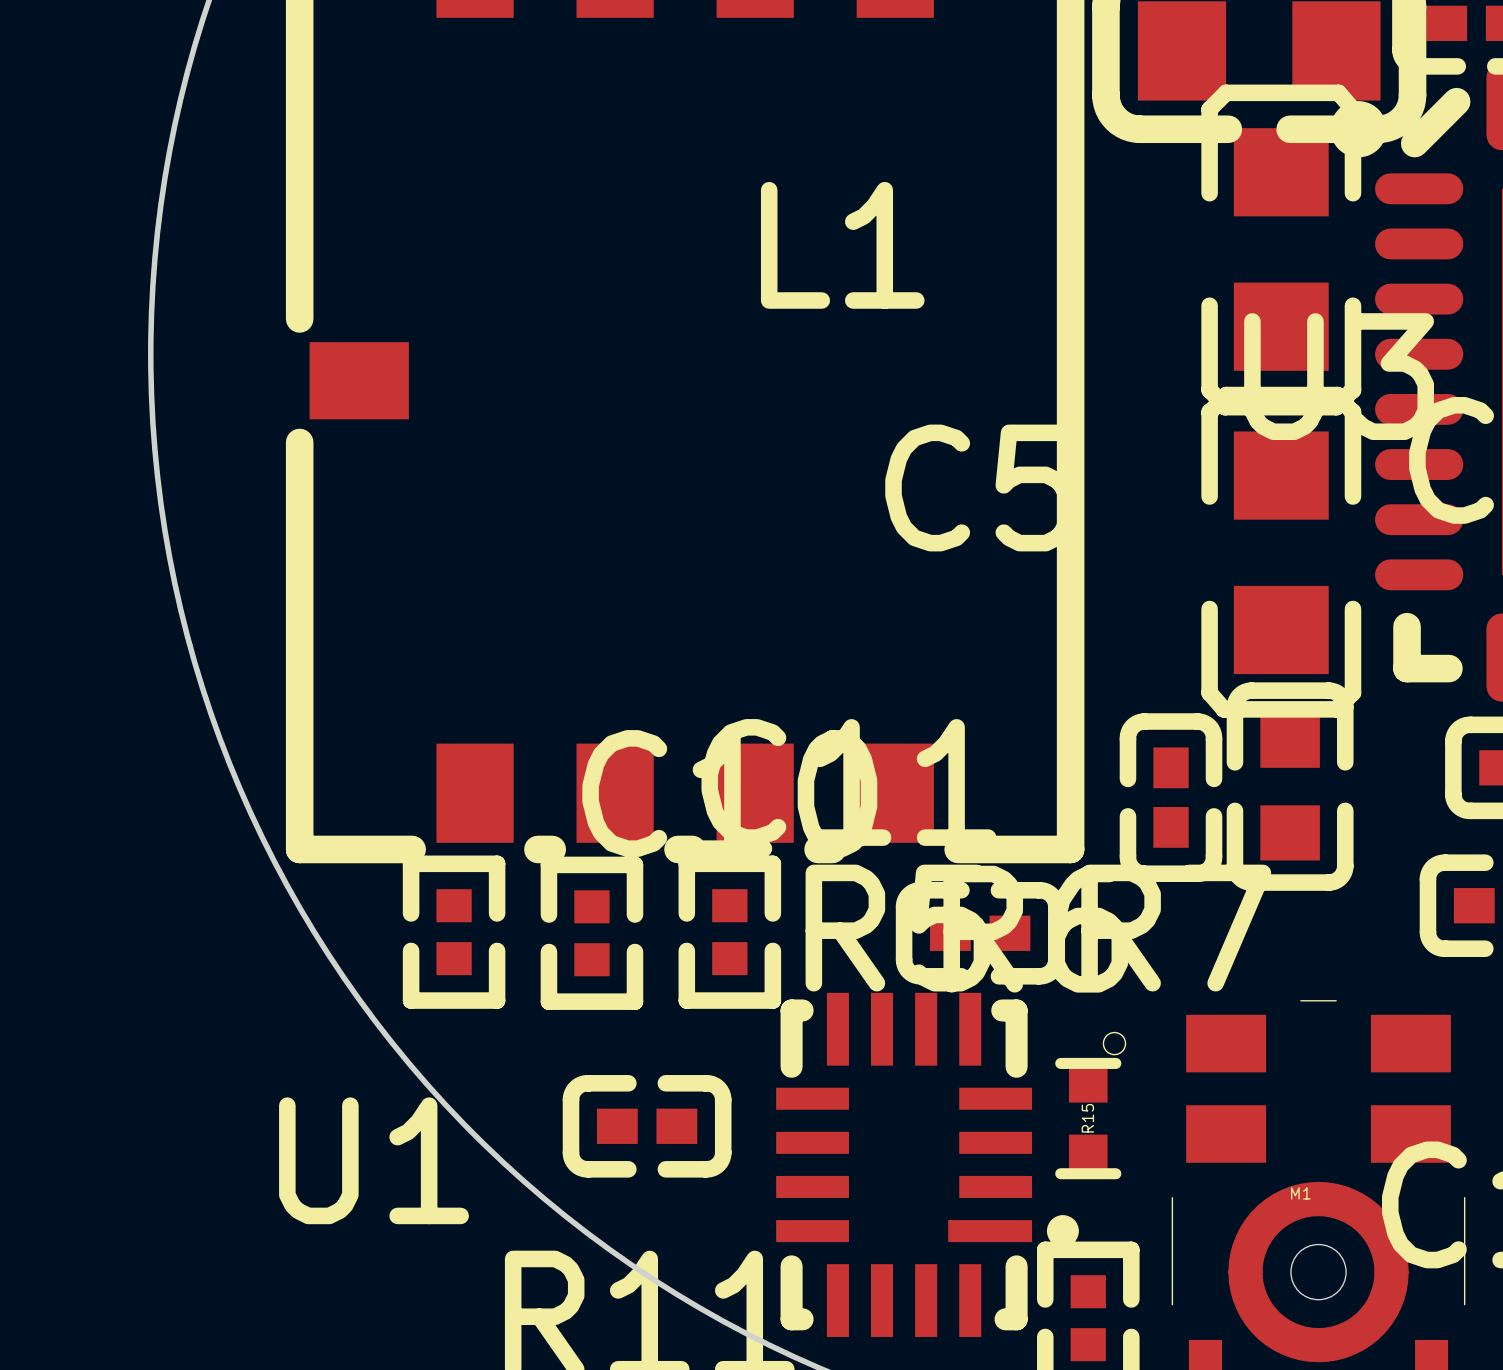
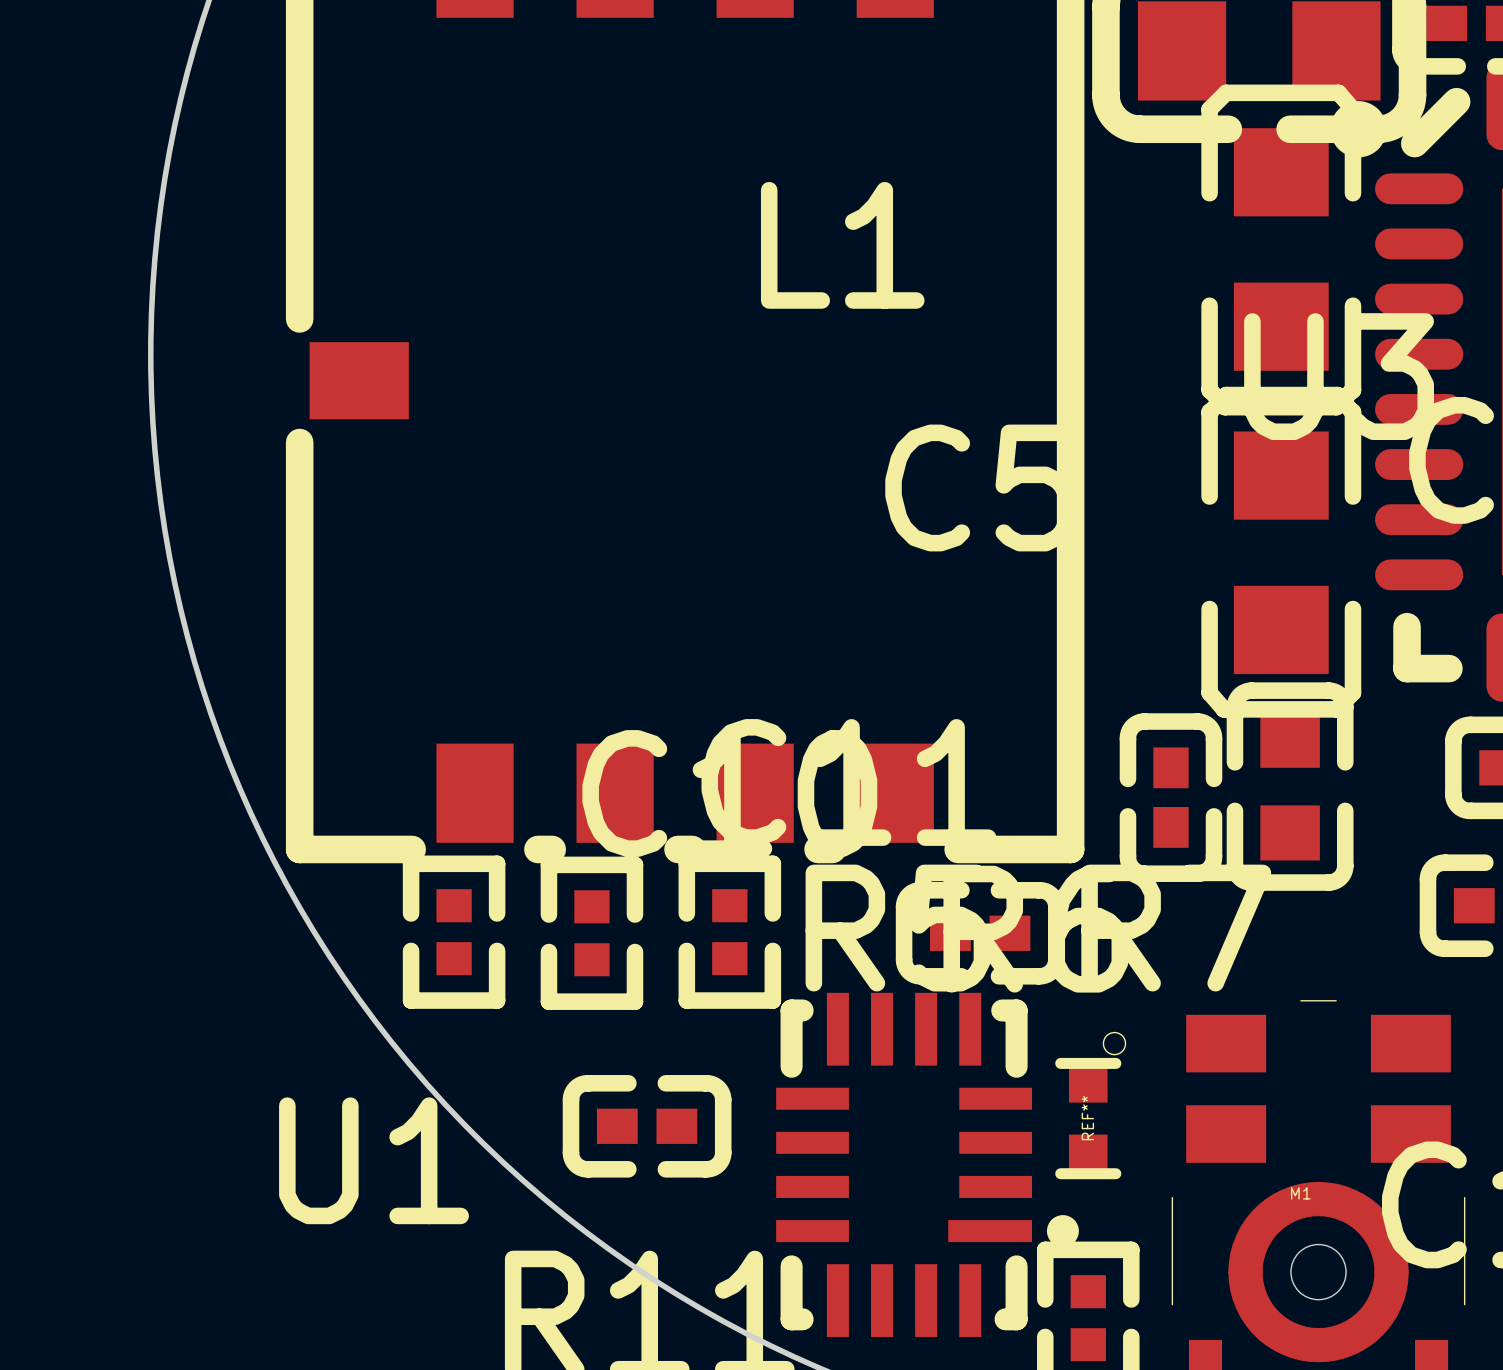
R15 name: R15 (1087, 1118) -> REF** (1087, 1118)

